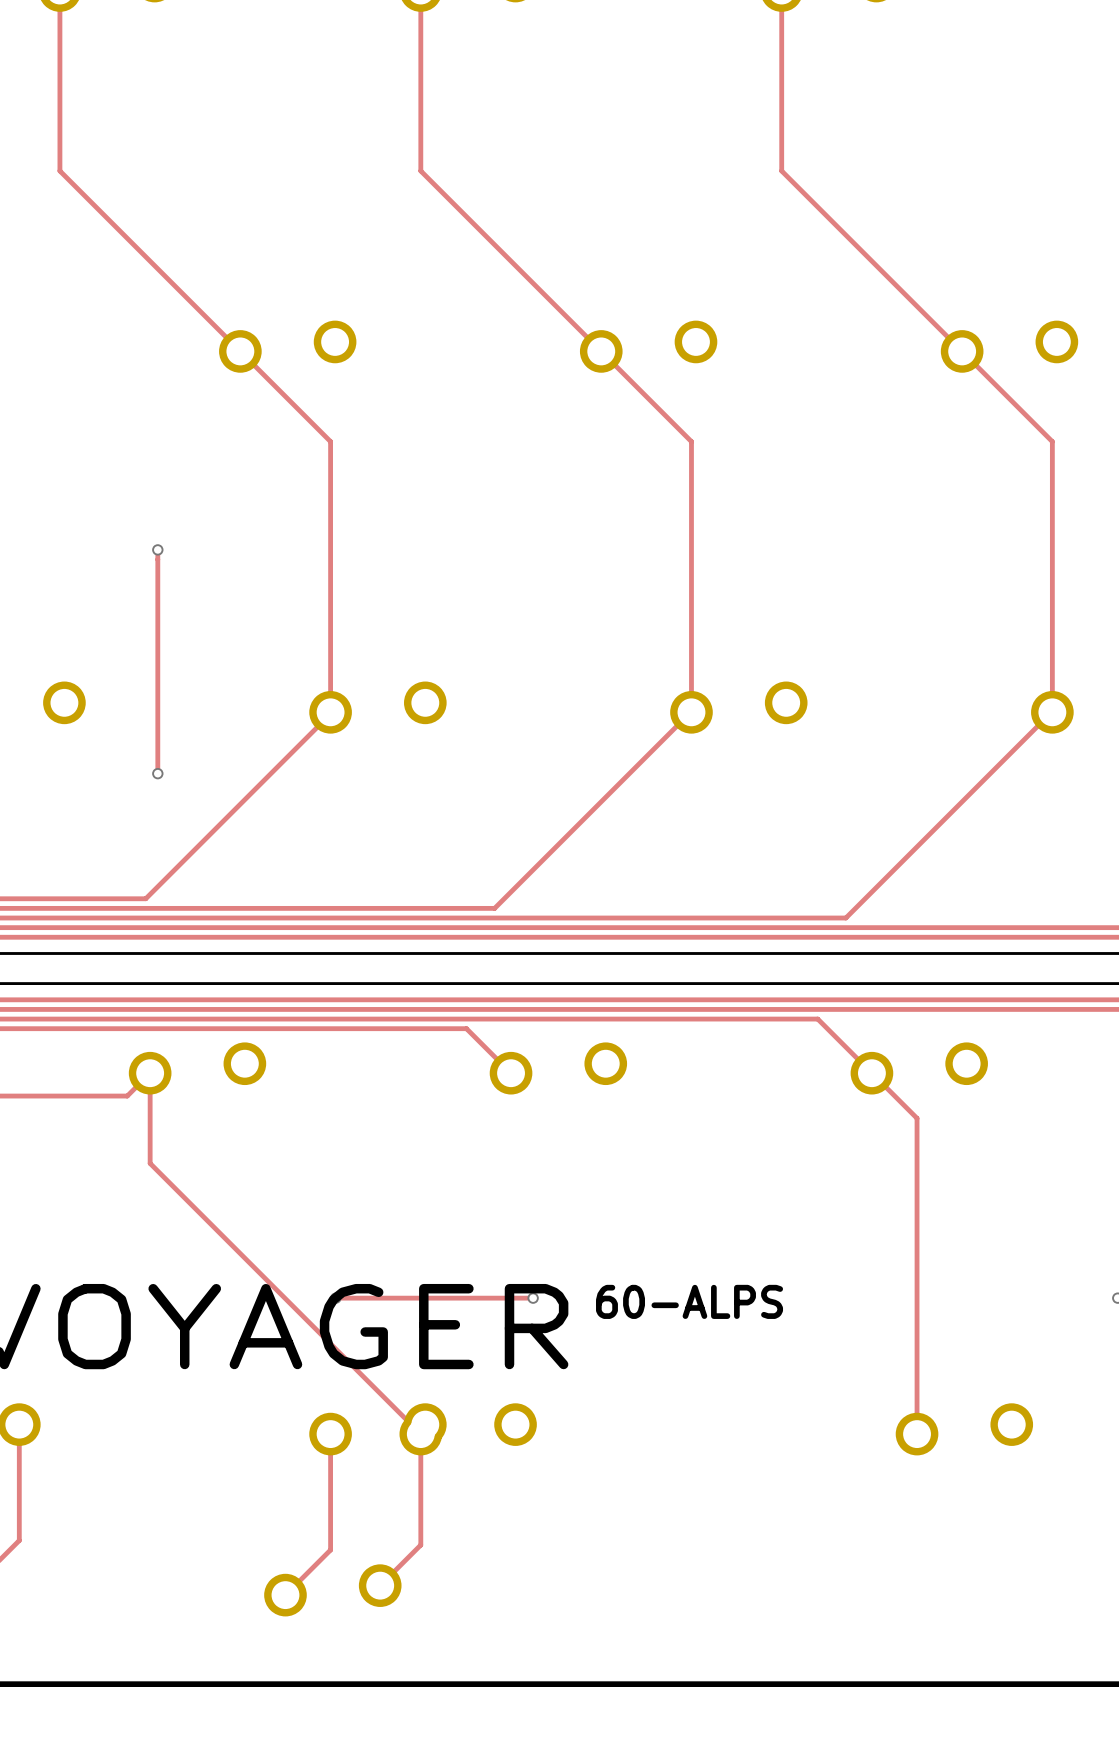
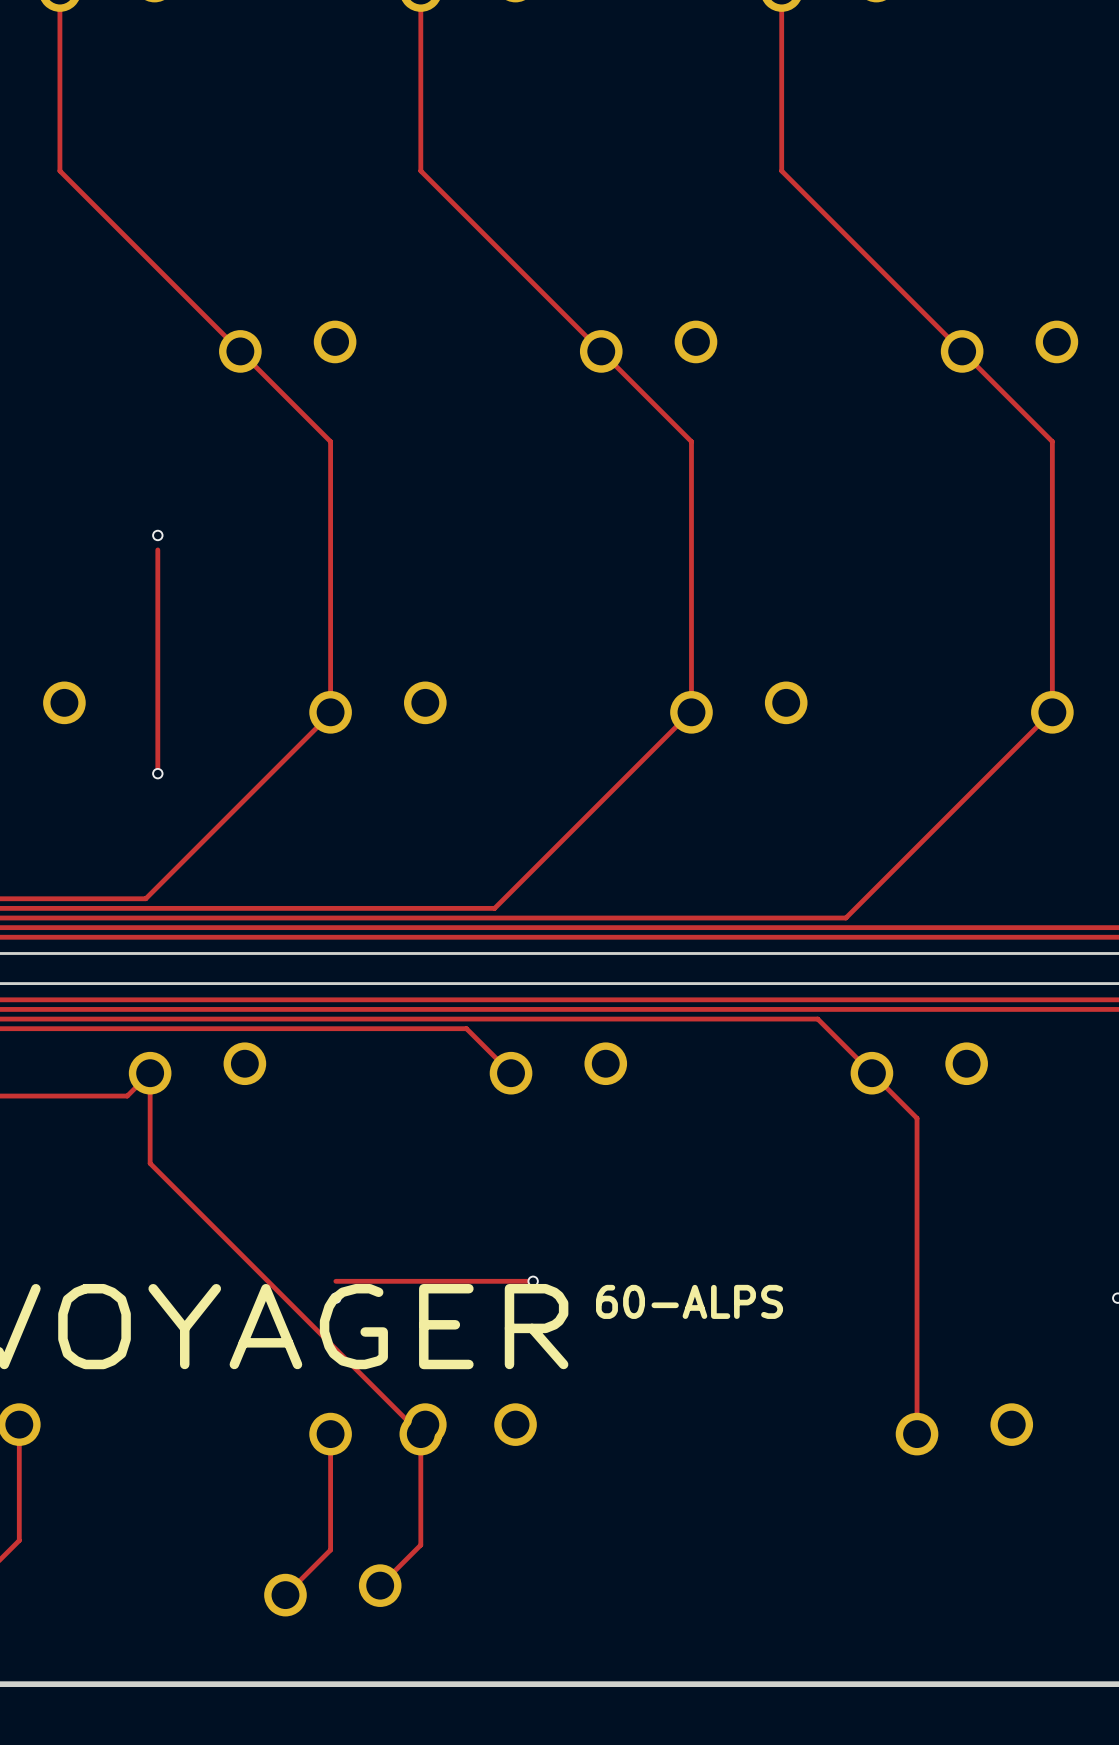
via position: (157, 549) -> (157, 535)
track: (335, 1298) (533, 1298) -> (335, 1281) (533, 1281)
via position: (533, 1298) -> (533, 1281)

